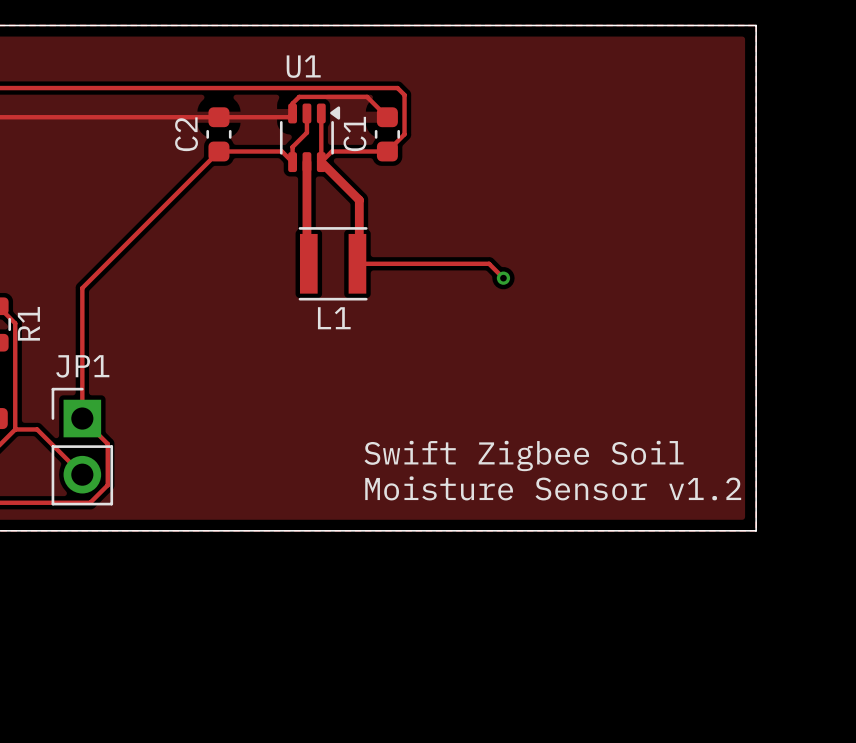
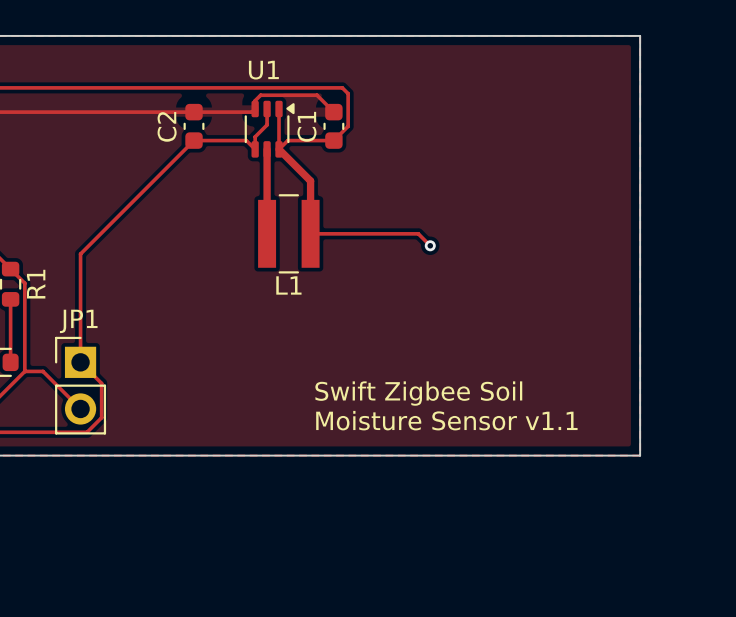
L1 footprint: [298, 227, 368, 301] -> [258, 194, 320, 274]
text: Moisture Sensor v1.2 (553, 488) -> Moisture Sensor v1.1 (446, 420)

